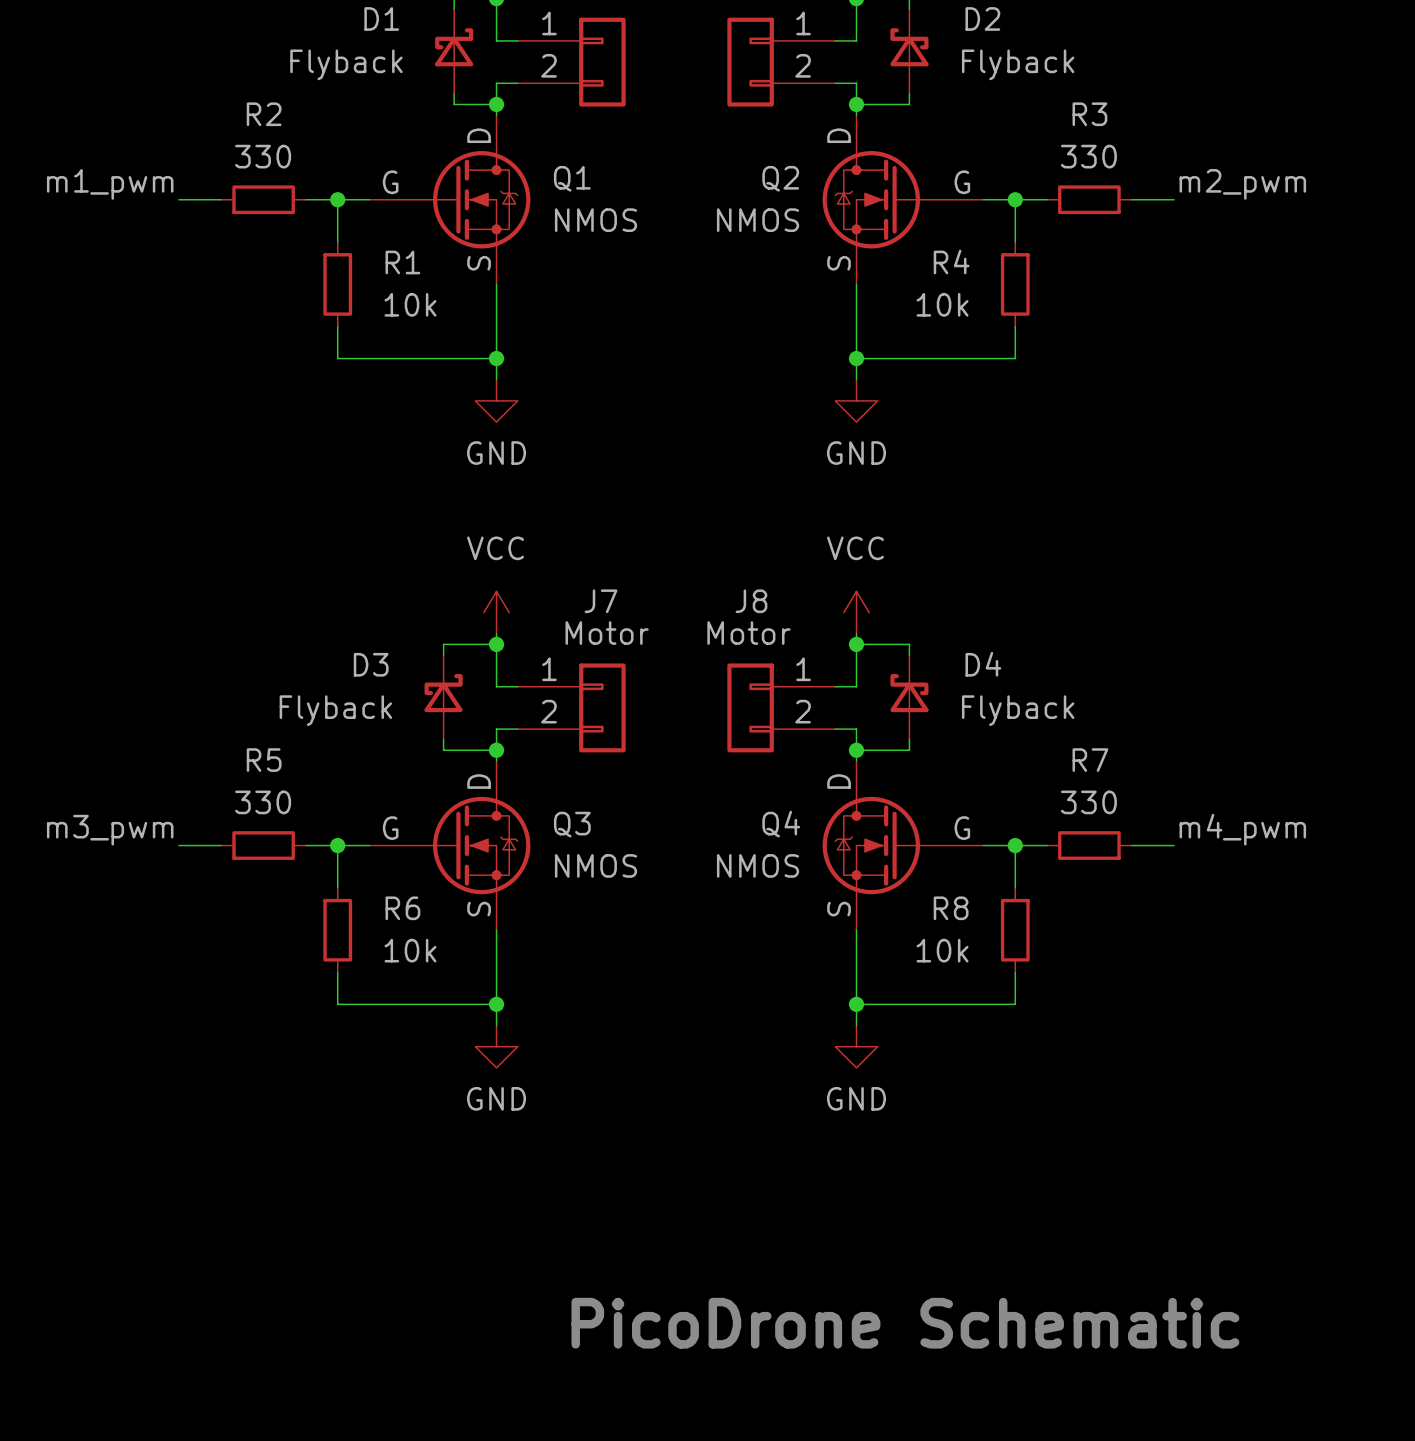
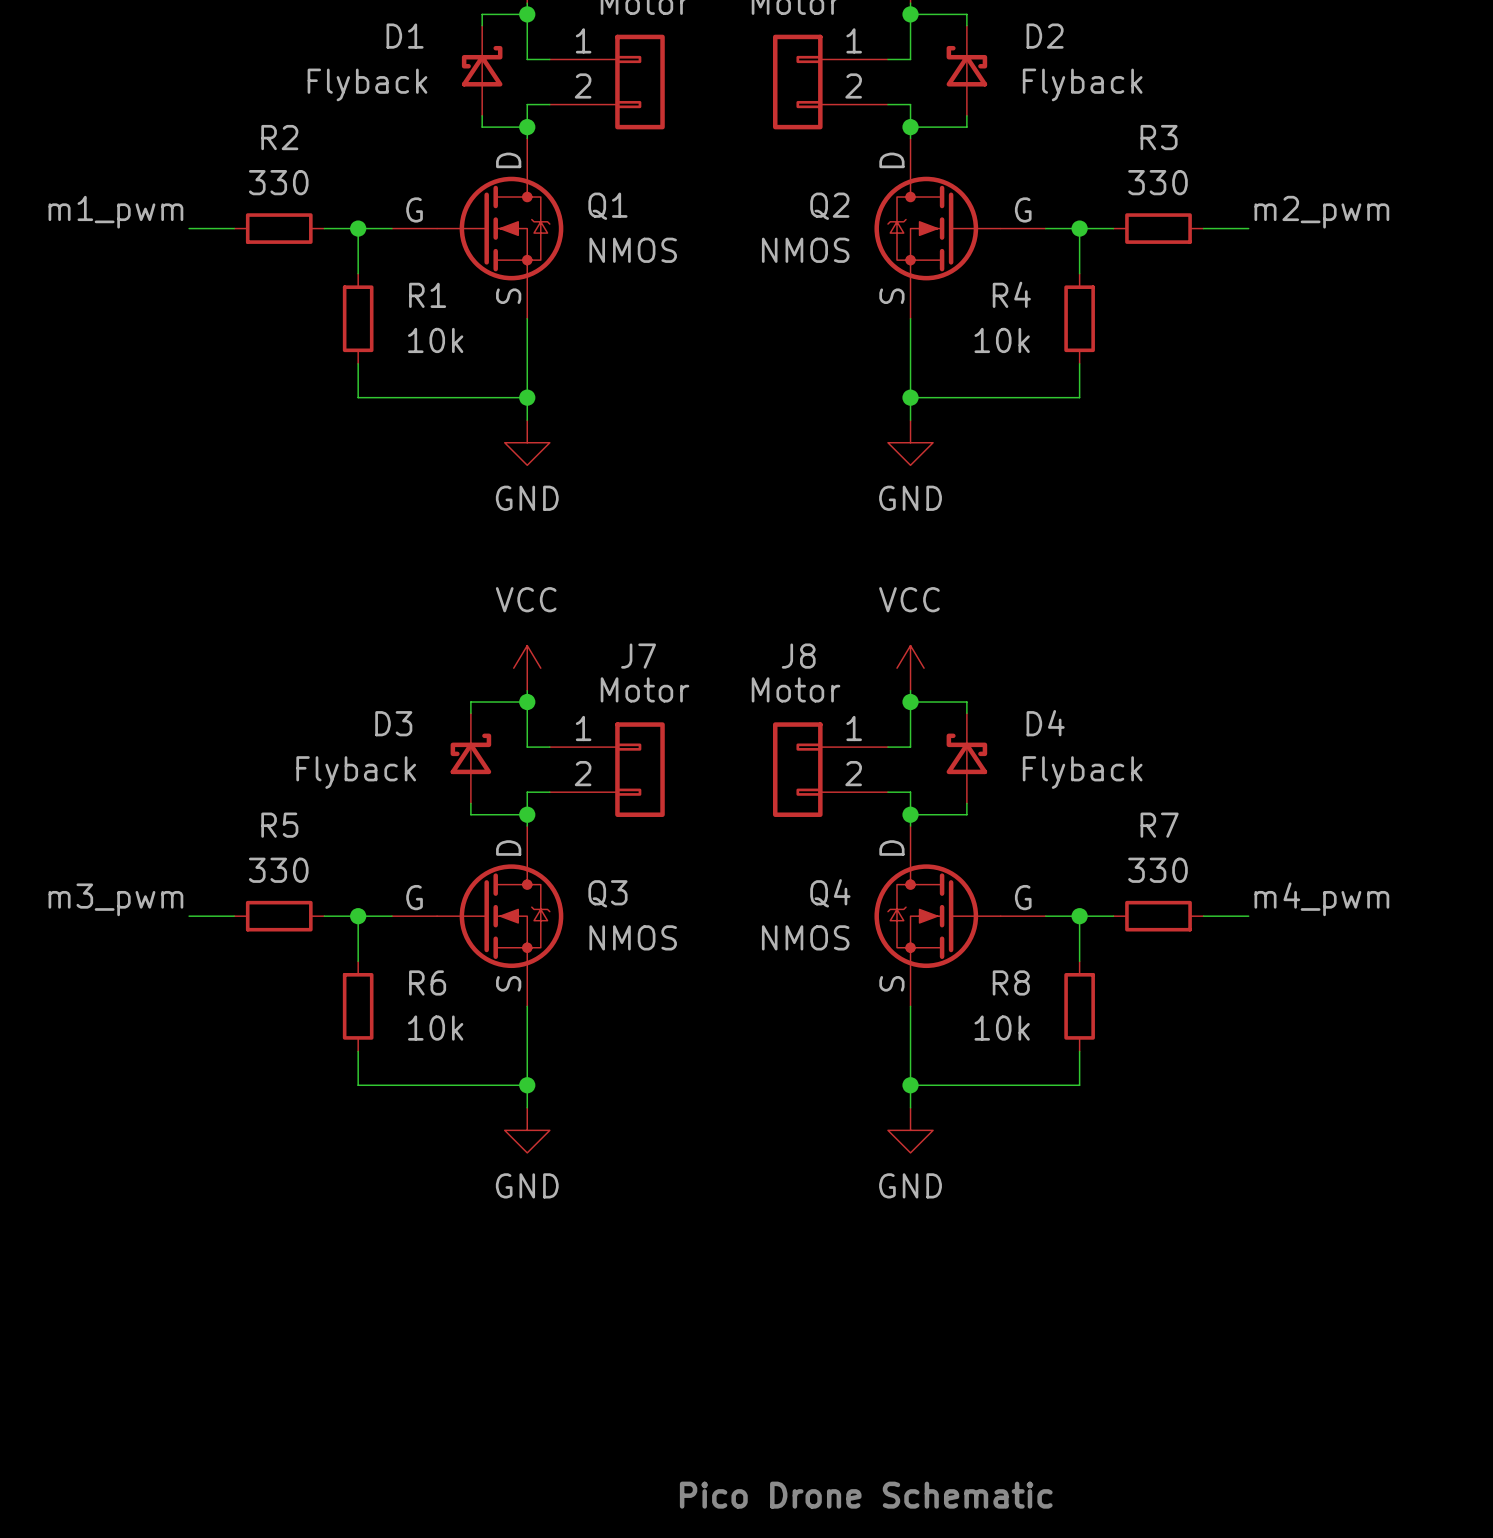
text: PicoDrone Schematic (905, 1323) -> Pico Drone Schematic (866, 1495)

